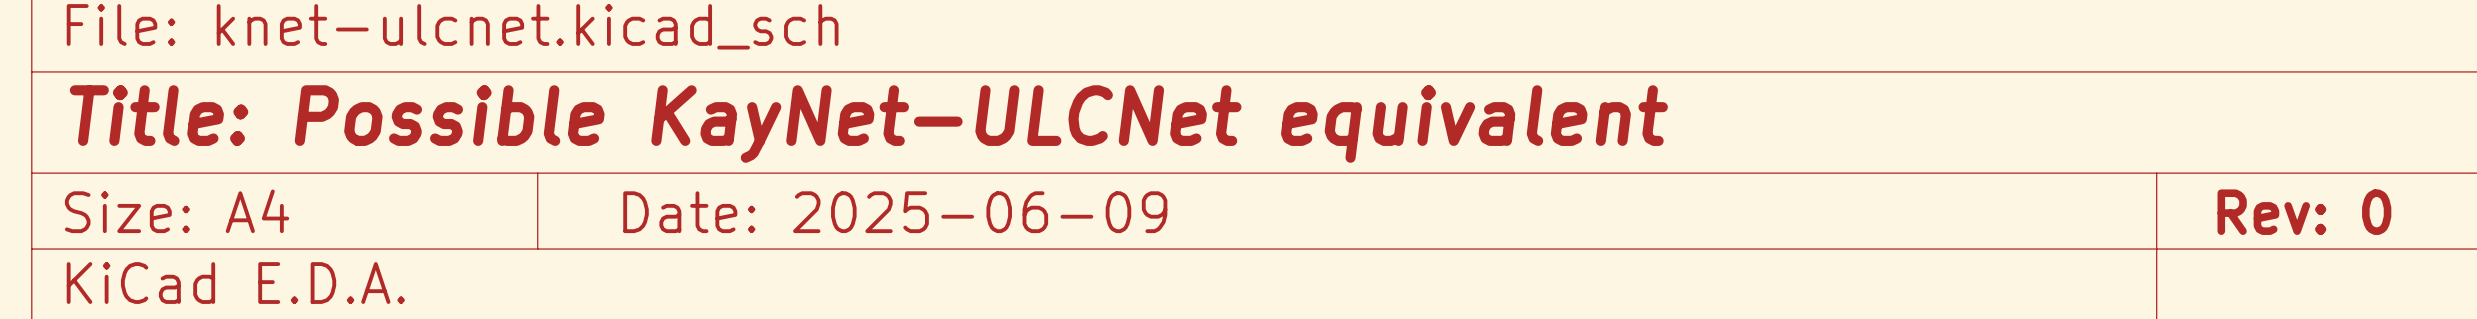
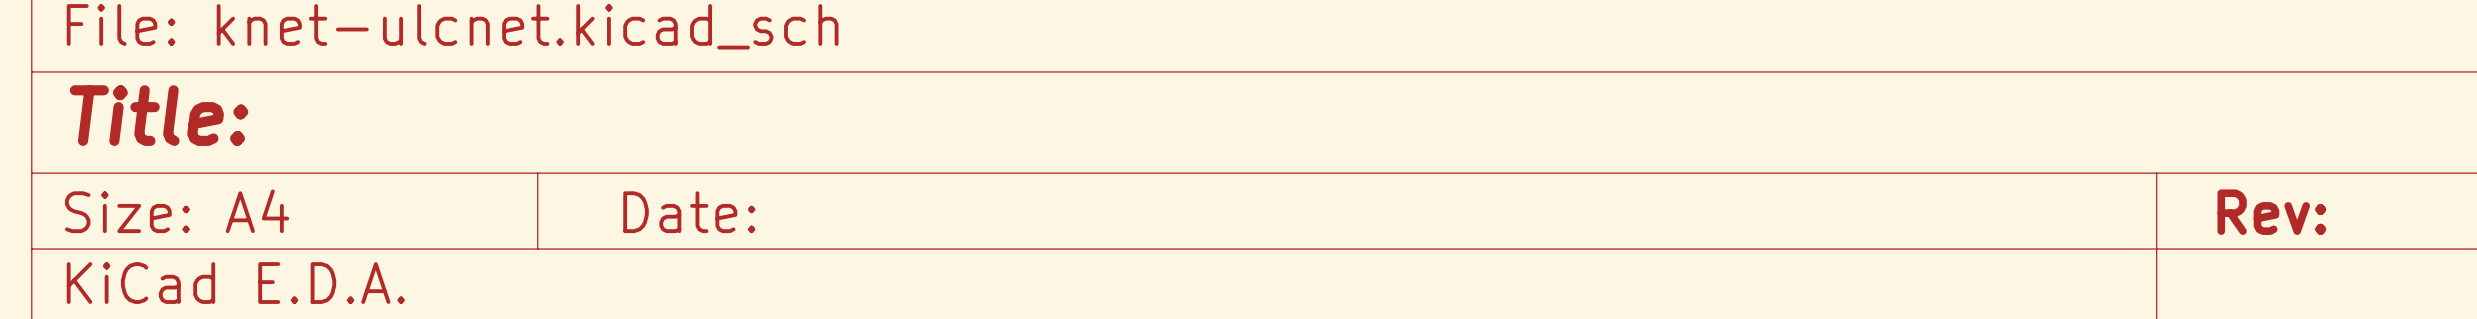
title block: Title: Possible KayNet-ULCNet equivalent (868, 124) -> Title: (159, 115)
title block: Date: 2025-06-09 (895, 212) -> Date: (689, 212)
title block: Rev: 0 (2304, 212) -> Rev: (2271, 212)

